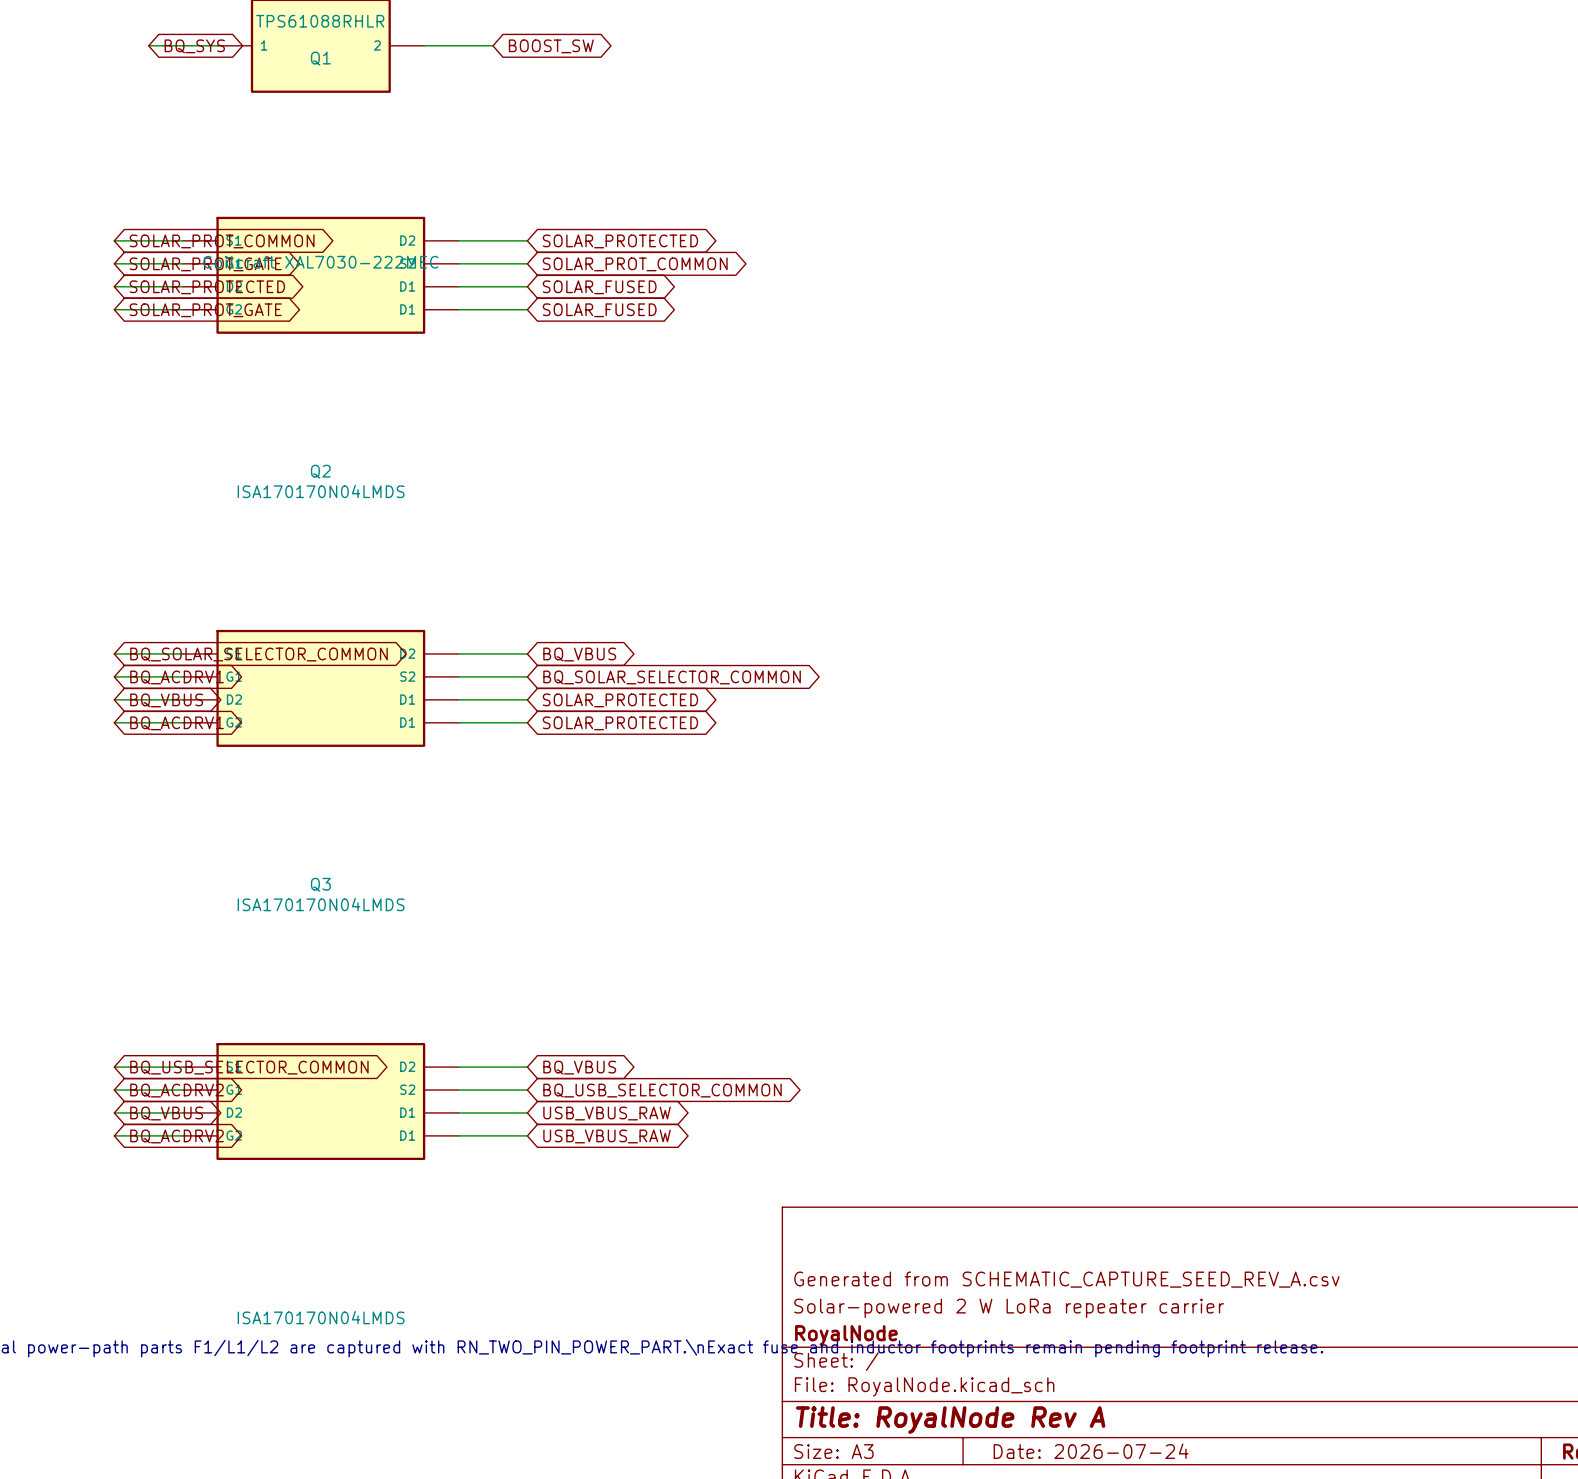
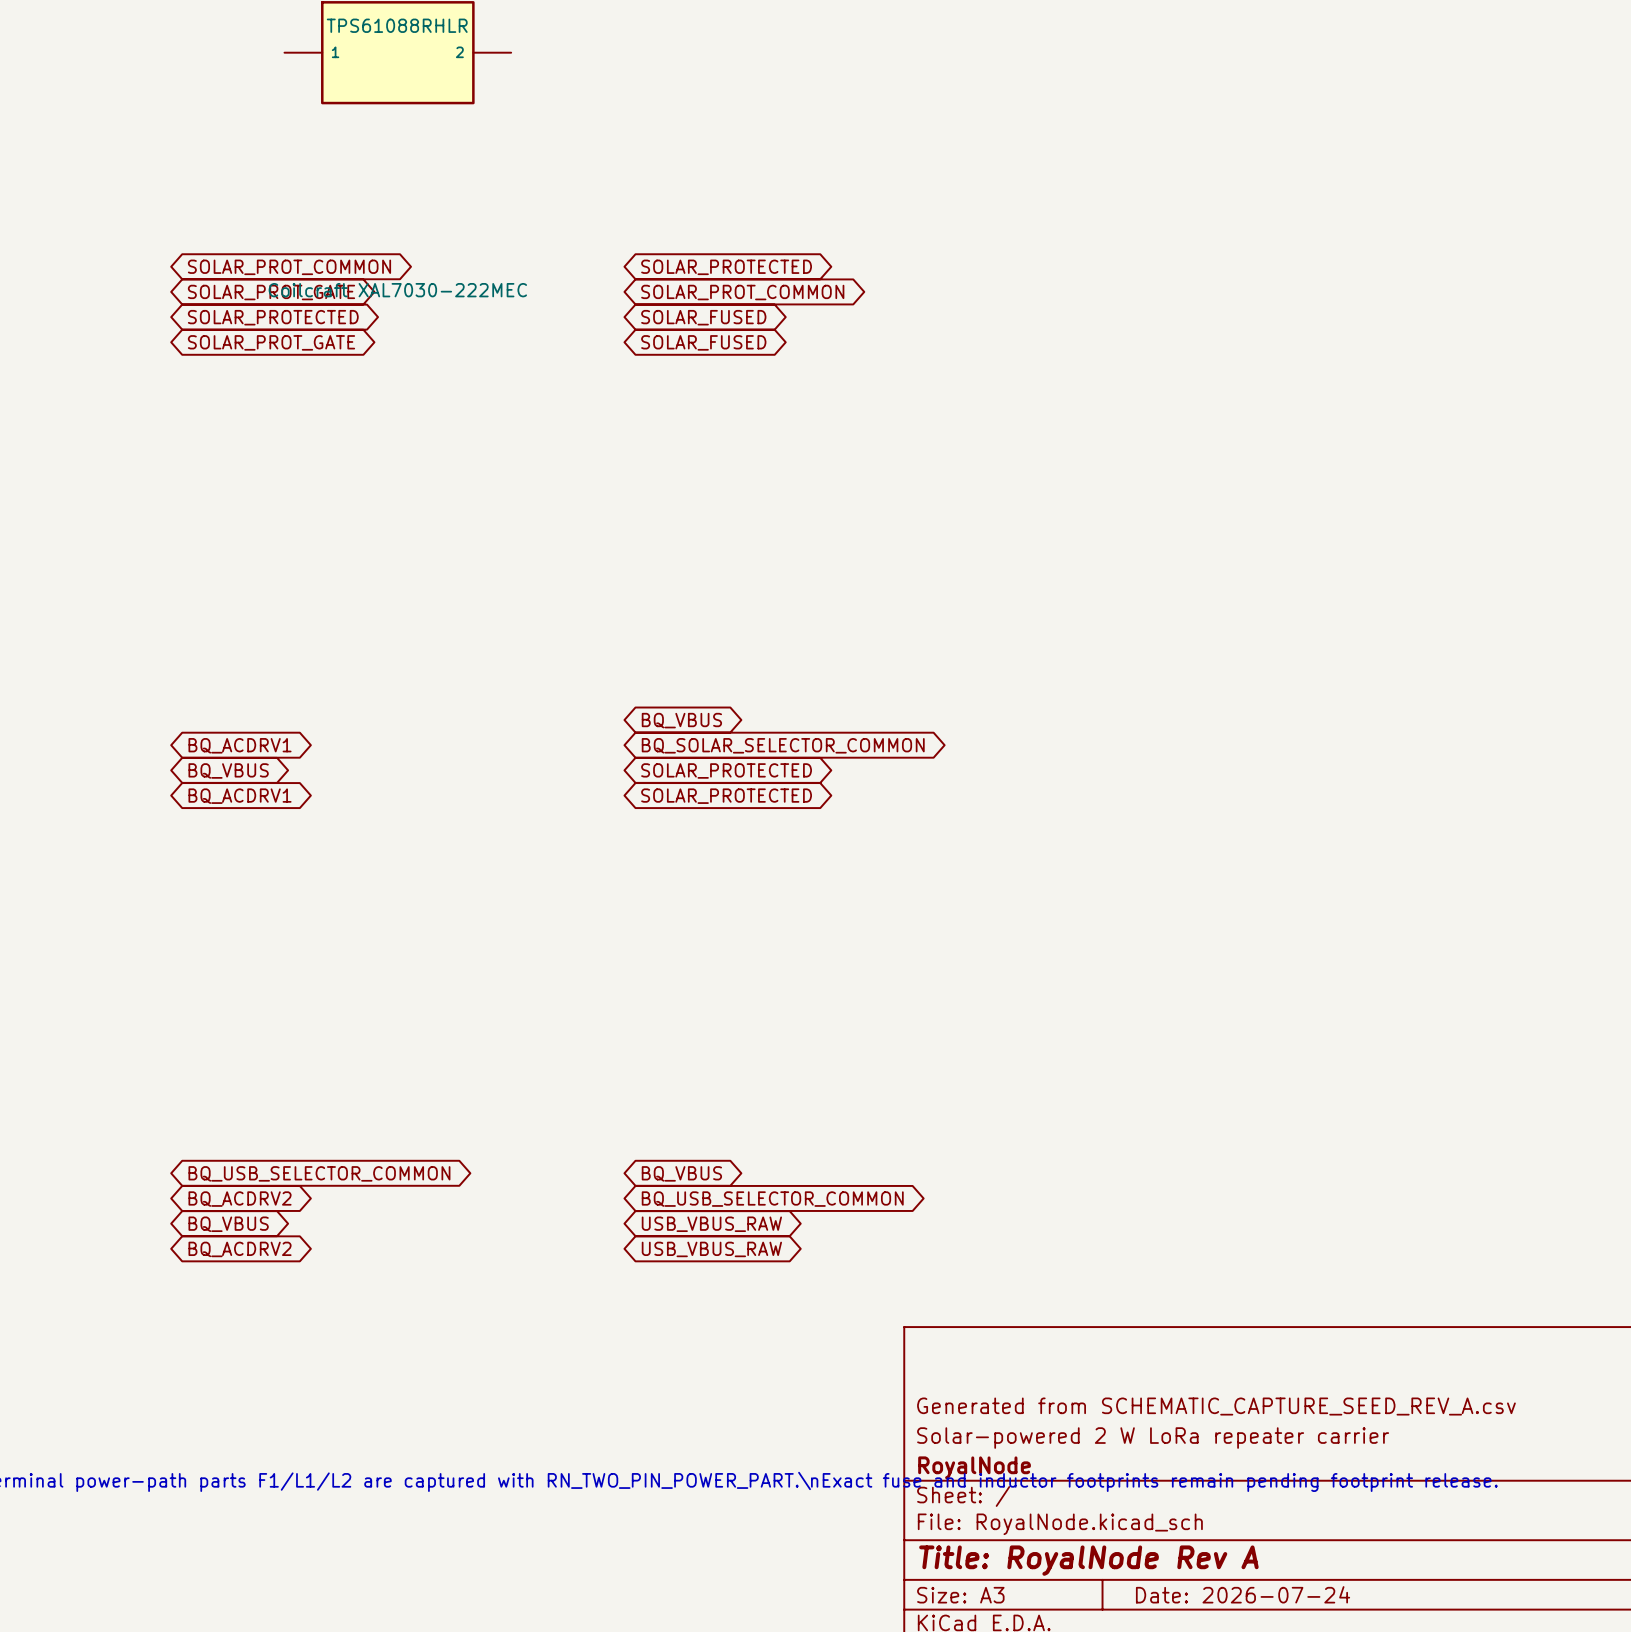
wire: (148, 45) (217, 45) -> none
wire: (424, 45) (492, 45) -> none
global label: BQ_SYS (194, 46) -> none
global label: BOOST_SW (551, 46) -> none
wire: (114, 240) (183, 240) -> none
wire: (458, 240) (527, 240) -> none
wire: (114, 263) (183, 263) -> none
wire: (458, 263) (527, 263) -> none
Q1: ISA170170N04LMDS (320, 275) -> none
wire: (114, 286) (183, 286) -> none
wire: (458, 286) (527, 286) -> none
wire: (114, 309) (183, 309) -> none
wire: (458, 309) (527, 309) -> none
wire: (114, 653) (183, 653) -> none
wire: (458, 653) (527, 653) -> none
global label: BQ_SOLAR_SELECTOR_COMMON (258, 654) -> none
wire: (114, 676) (183, 676) -> none
wire: (458, 676) (527, 676) -> none
Q2: ISA170170N04LMDS (320, 688) -> none
wire: (114, 699) (183, 699) -> none
wire: (458, 699) (527, 699) -> none
wire: (114, 722) (183, 722) -> none
wire: (458, 722) (527, 722) -> none
wire: (114, 1067) (183, 1067) -> none
wire: (458, 1067) (527, 1067) -> none
wire: (114, 1090) (183, 1090) -> none
wire: (458, 1090) (527, 1090) -> none
Q3: ISA170170N04LMDS (320, 1101) -> none
wire: (114, 1112) (183, 1112) -> none
wire: (458, 1112) (527, 1112) -> none
wire: (114, 1135) (183, 1135) -> none
wire: (458, 1135) (527, 1135) -> none

